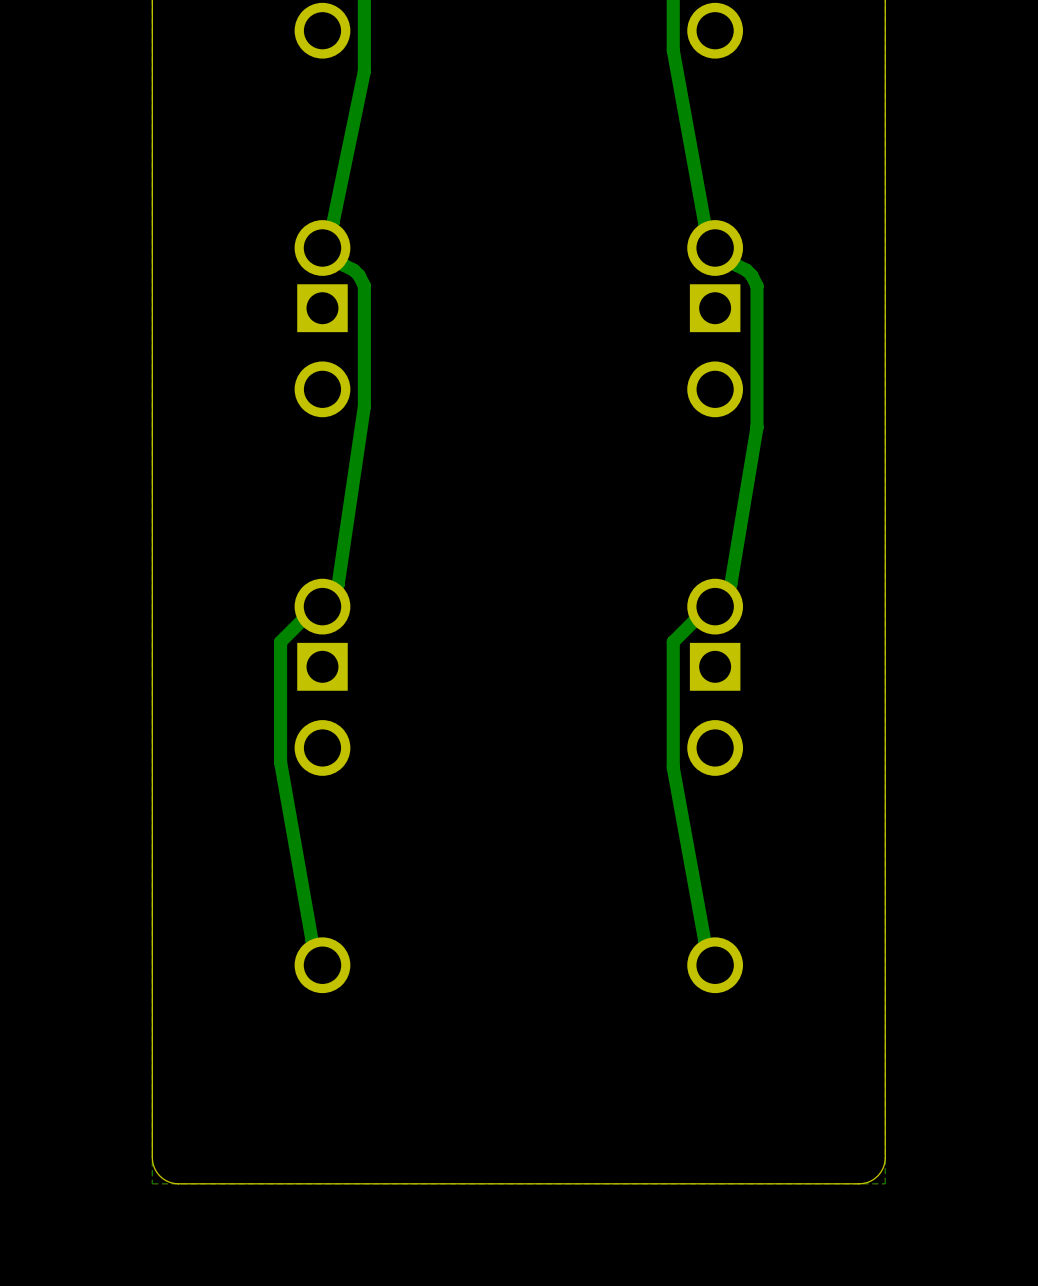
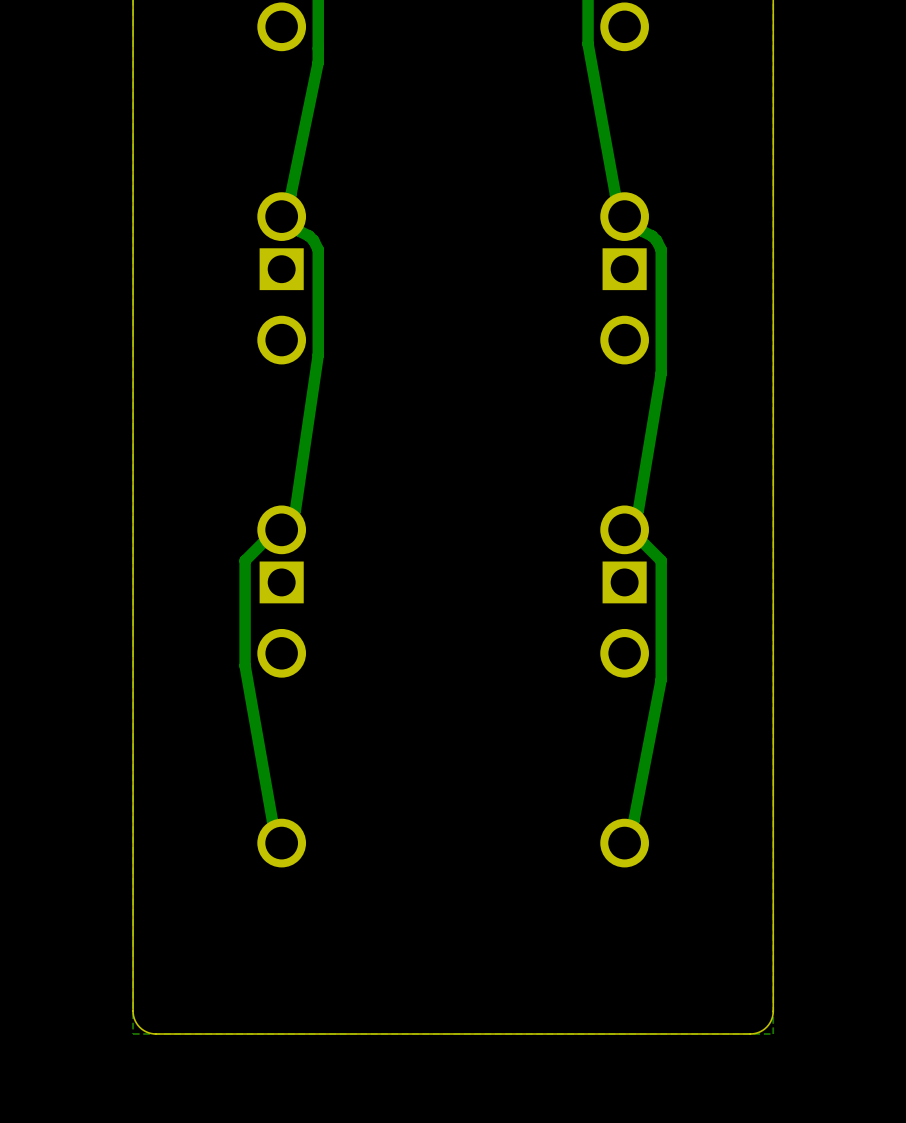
bottom track: (715, 606) (694, 621) (673, 641) (673, 767) (704, 940) (715, 965) -> (624, 529) (642, 542) (661, 560) (661, 679) (633, 821) (624, 843)

